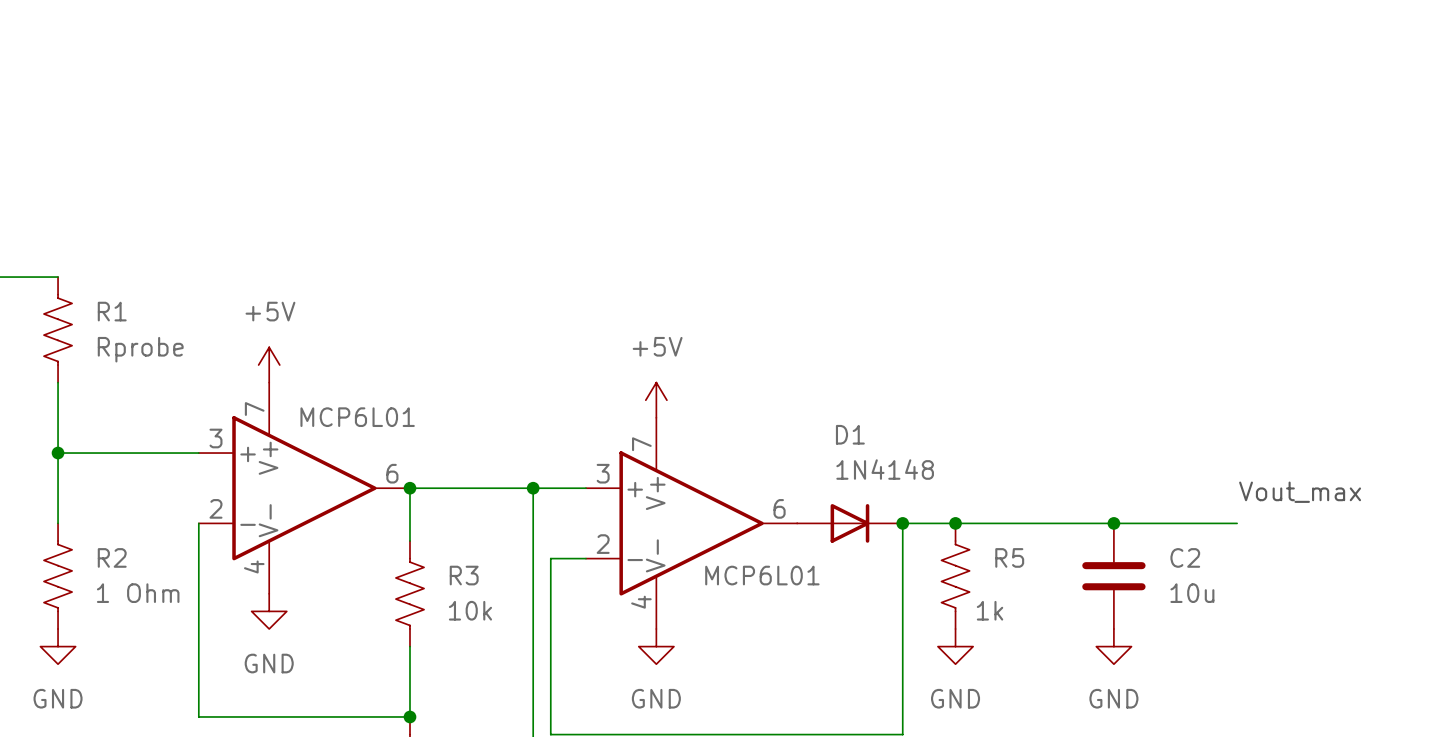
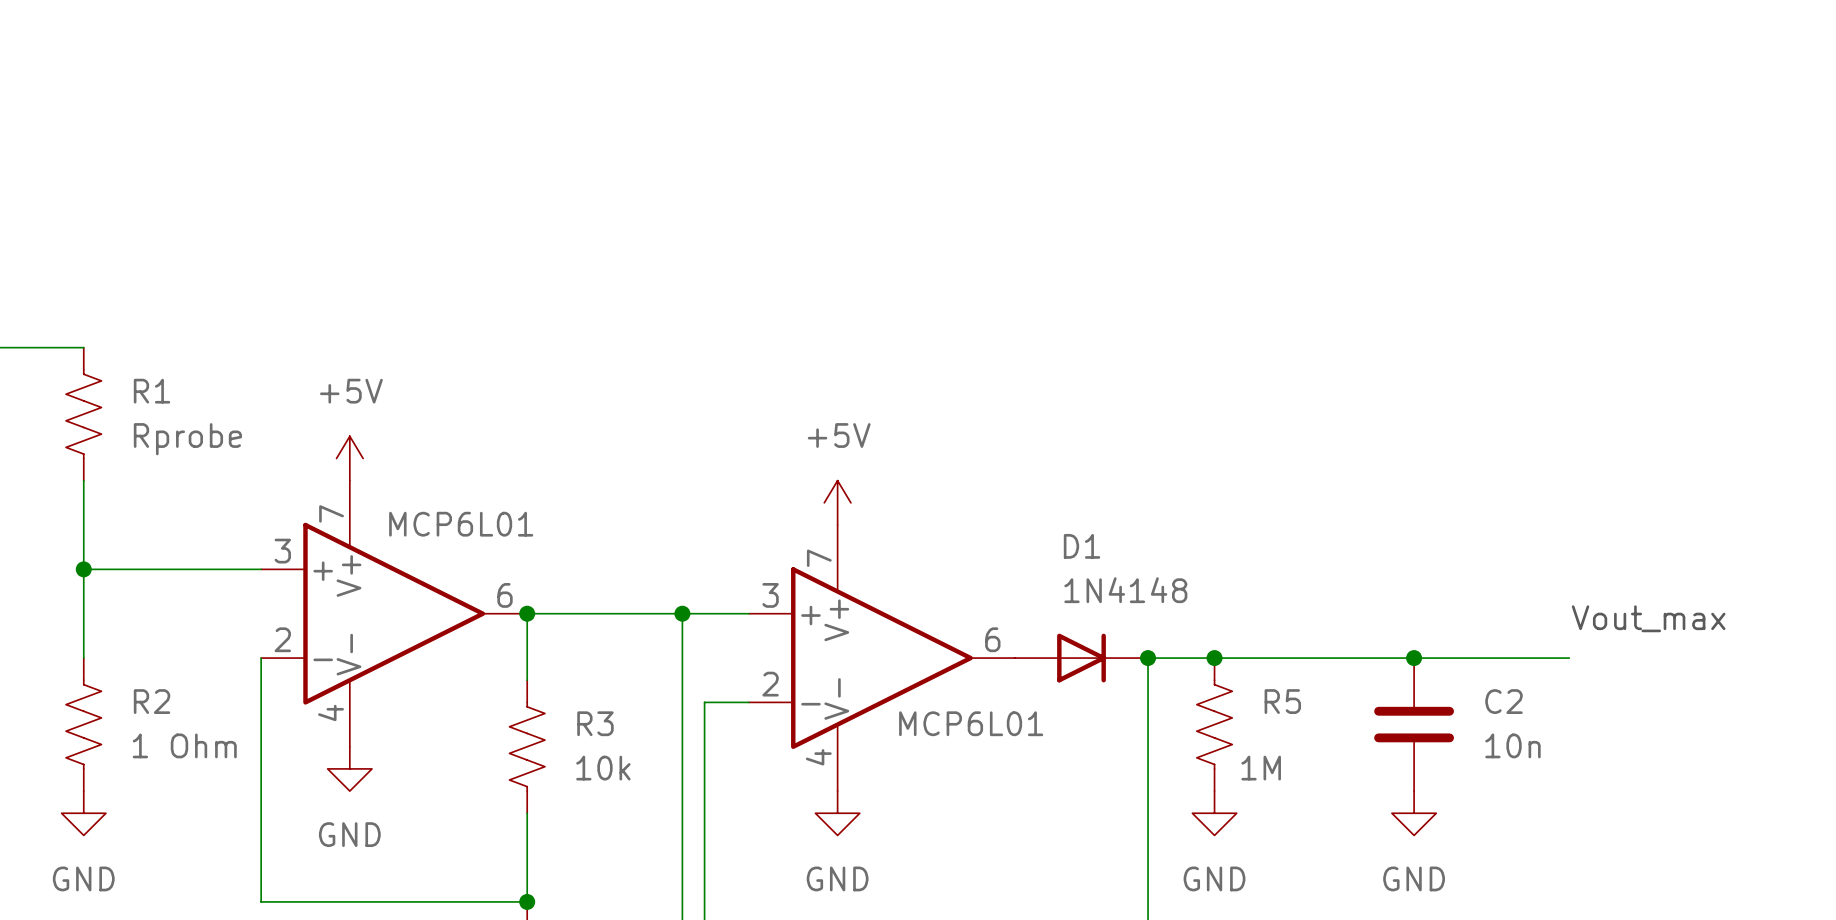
C2 value: 10u (1192, 593) -> 10n (1512, 745)
R5 value: 1k (990, 610) -> 1M (1261, 768)

